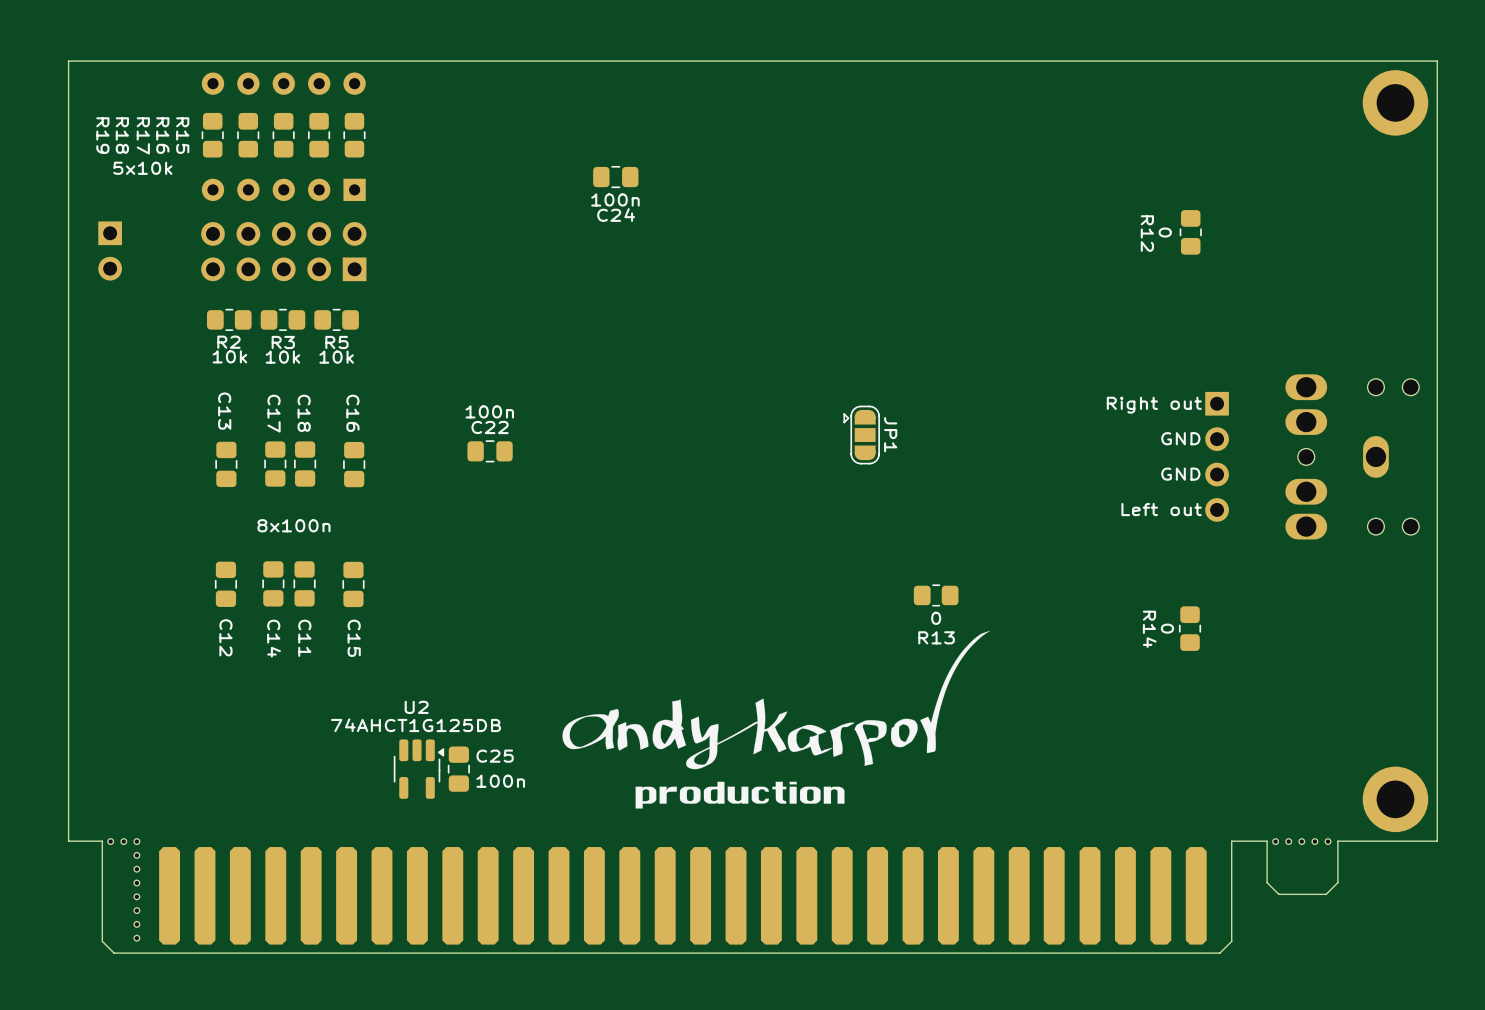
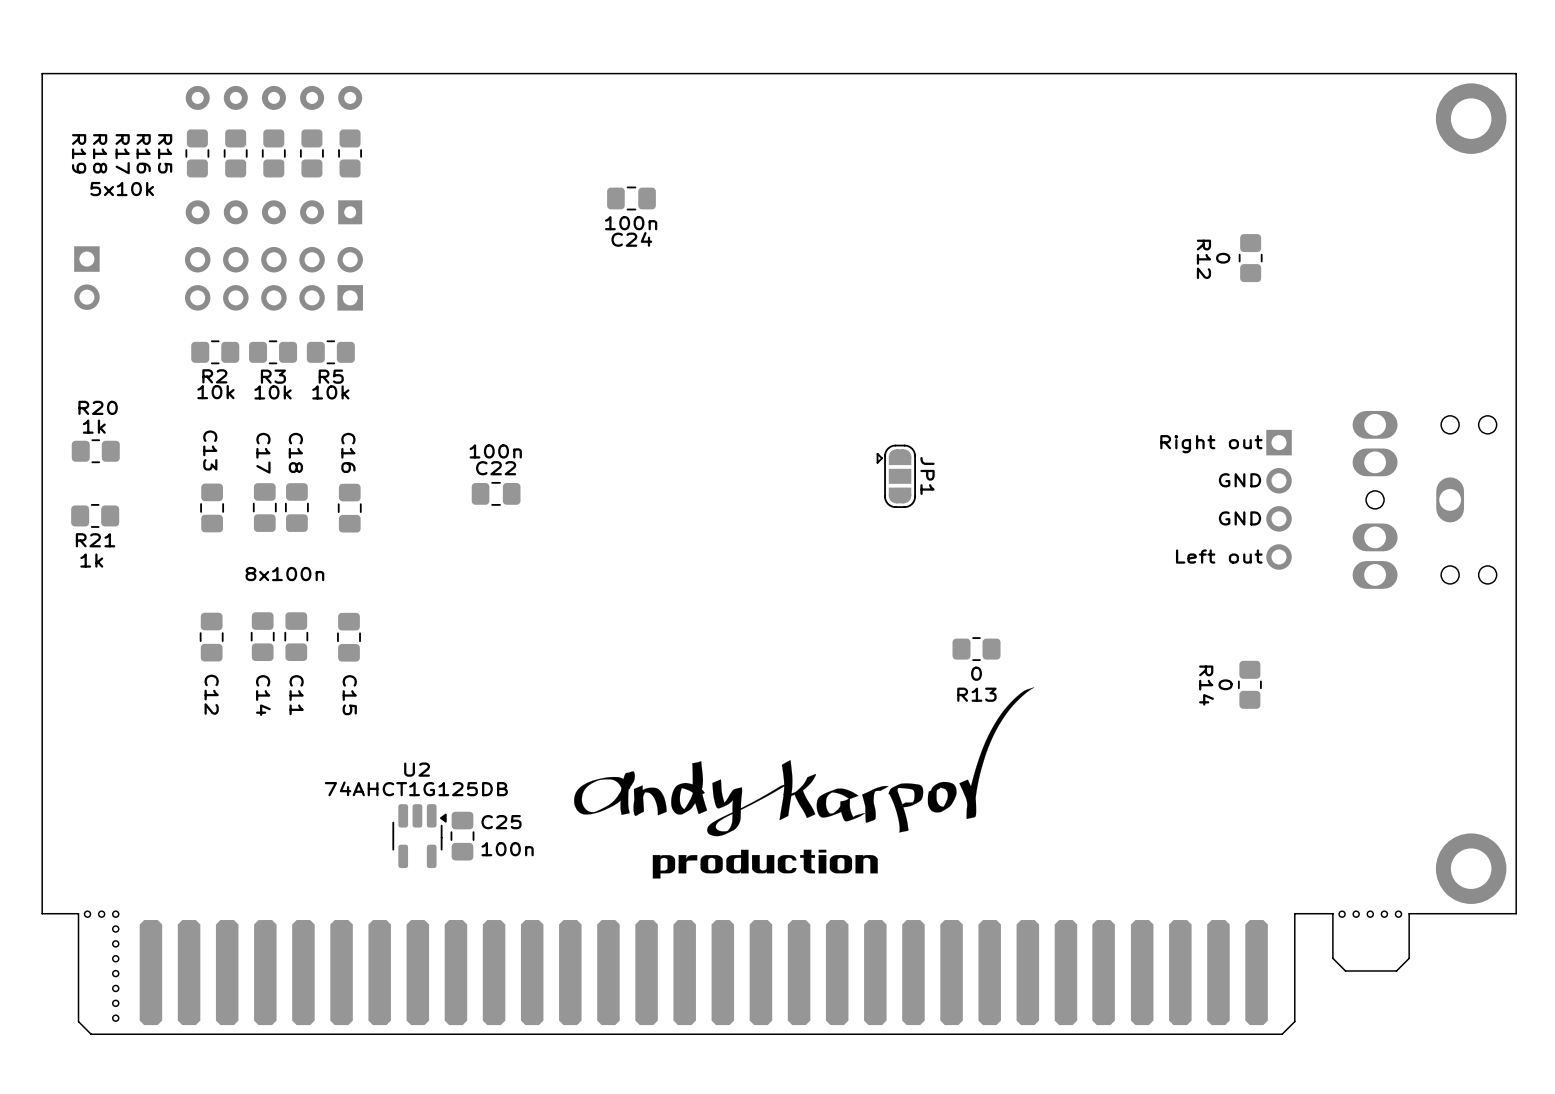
R20: none -> 1k (95, 451)
R21: none -> 1k (95, 515)

